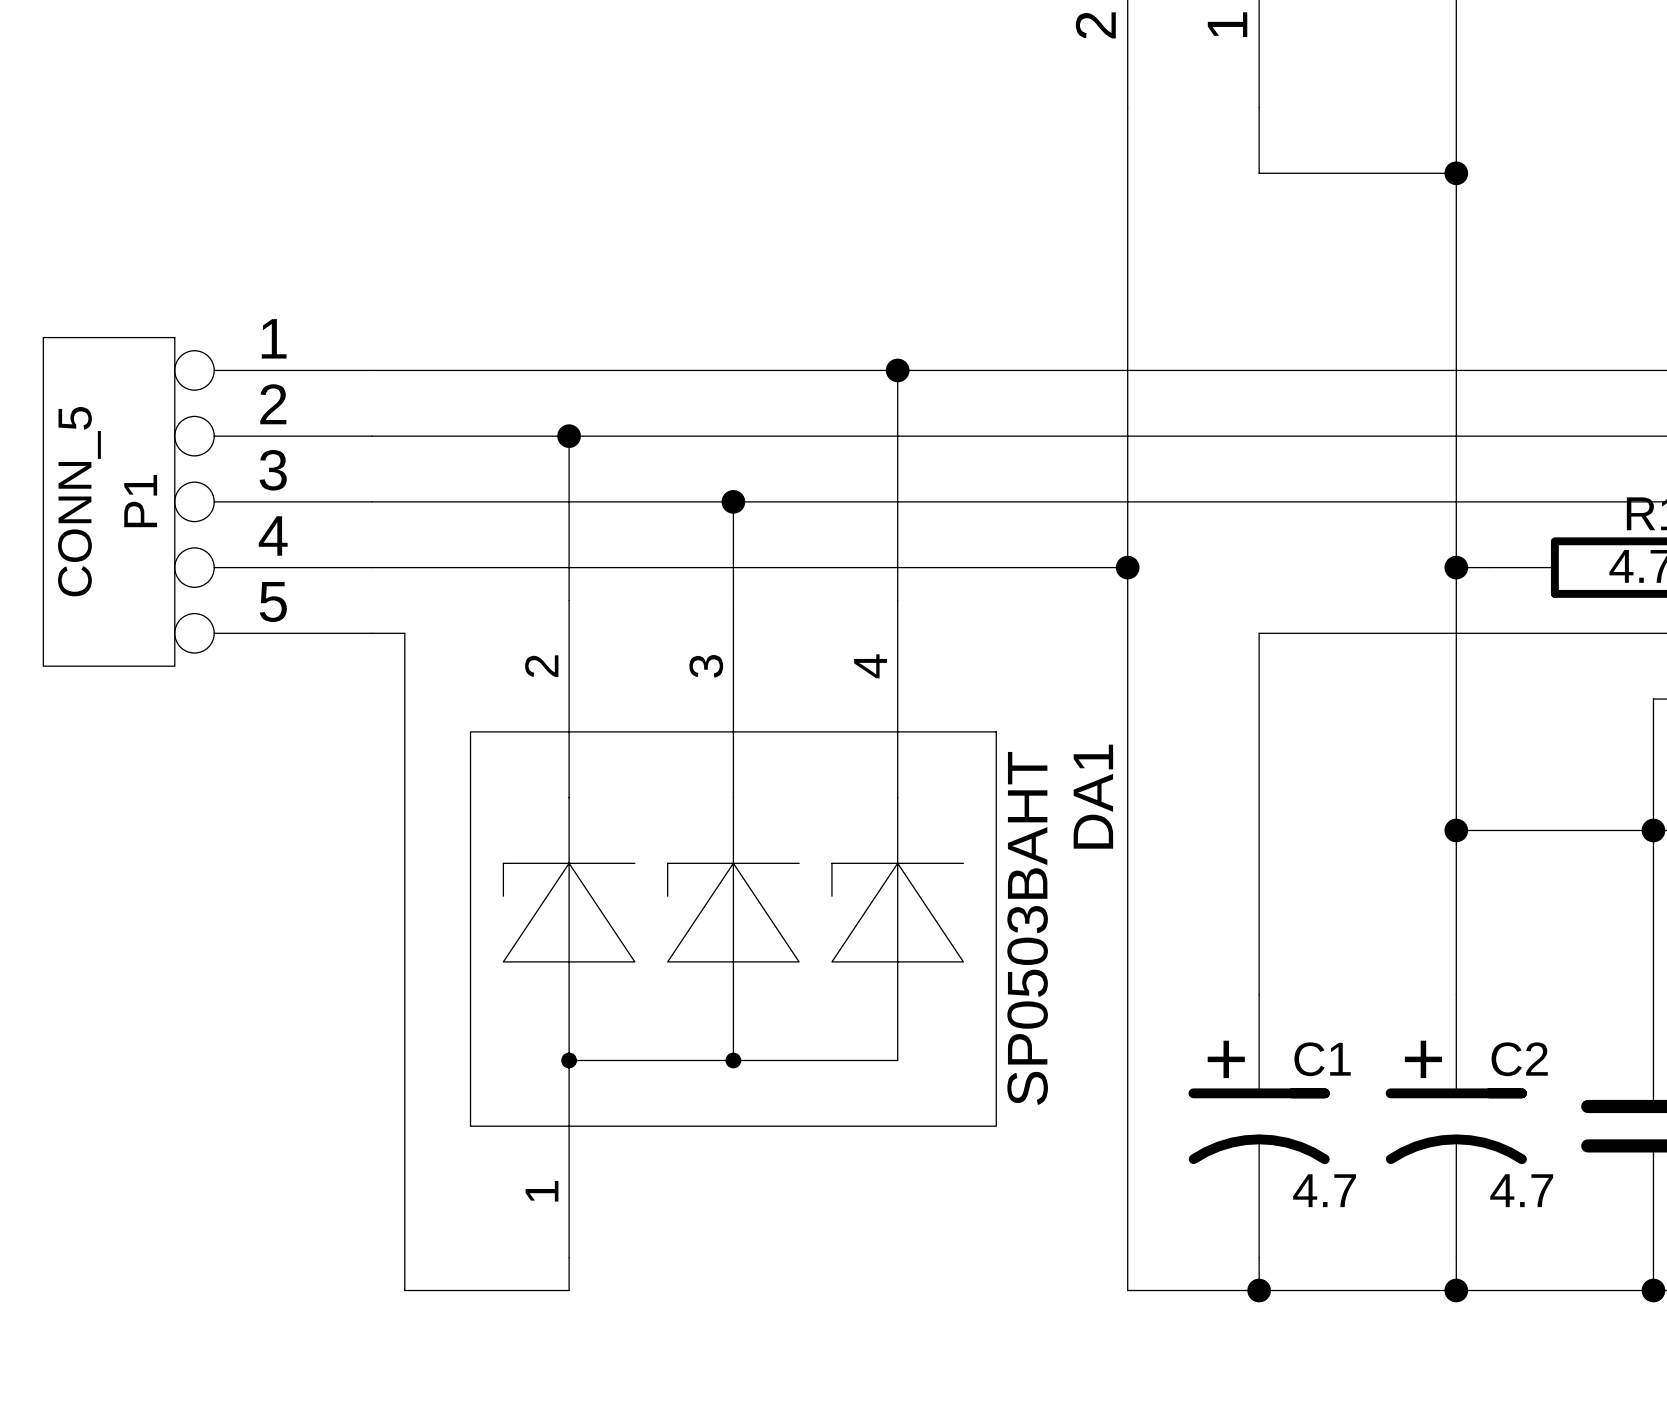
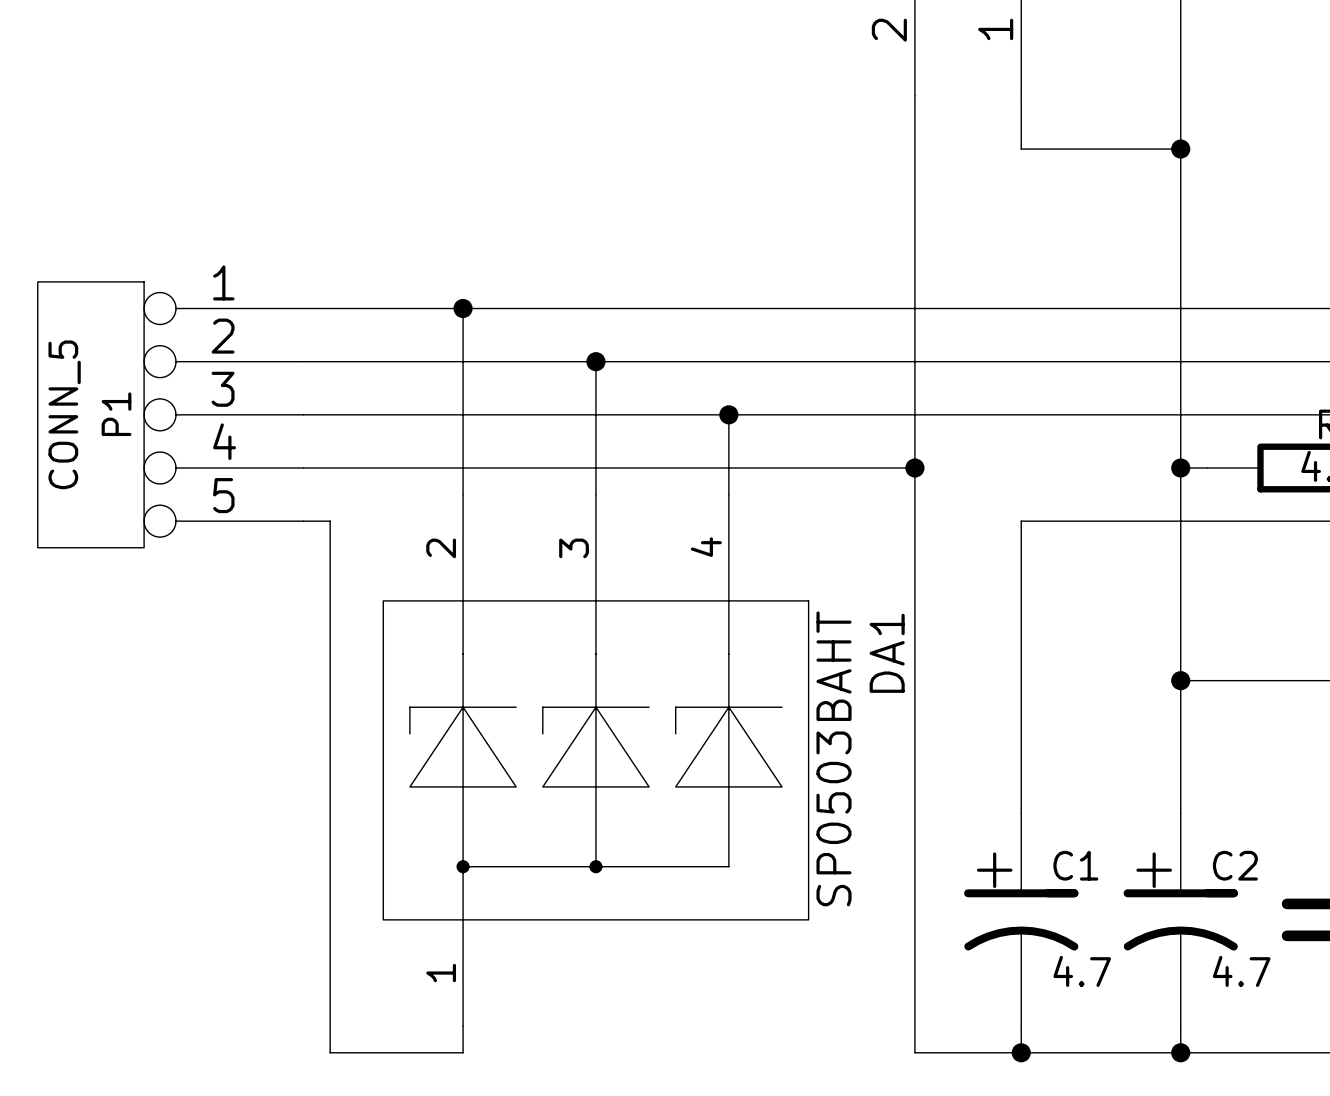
wire: none -> (463, 308) (463, 361)
wire: (897, 370) (897, 501) -> none
junction: (897, 370) -> none
junction position: (569, 436) -> (463, 308)
wire: none -> (595, 361) (595, 414)
junction position: (733, 501) -> (595, 361)
junction: none -> (728, 414)

